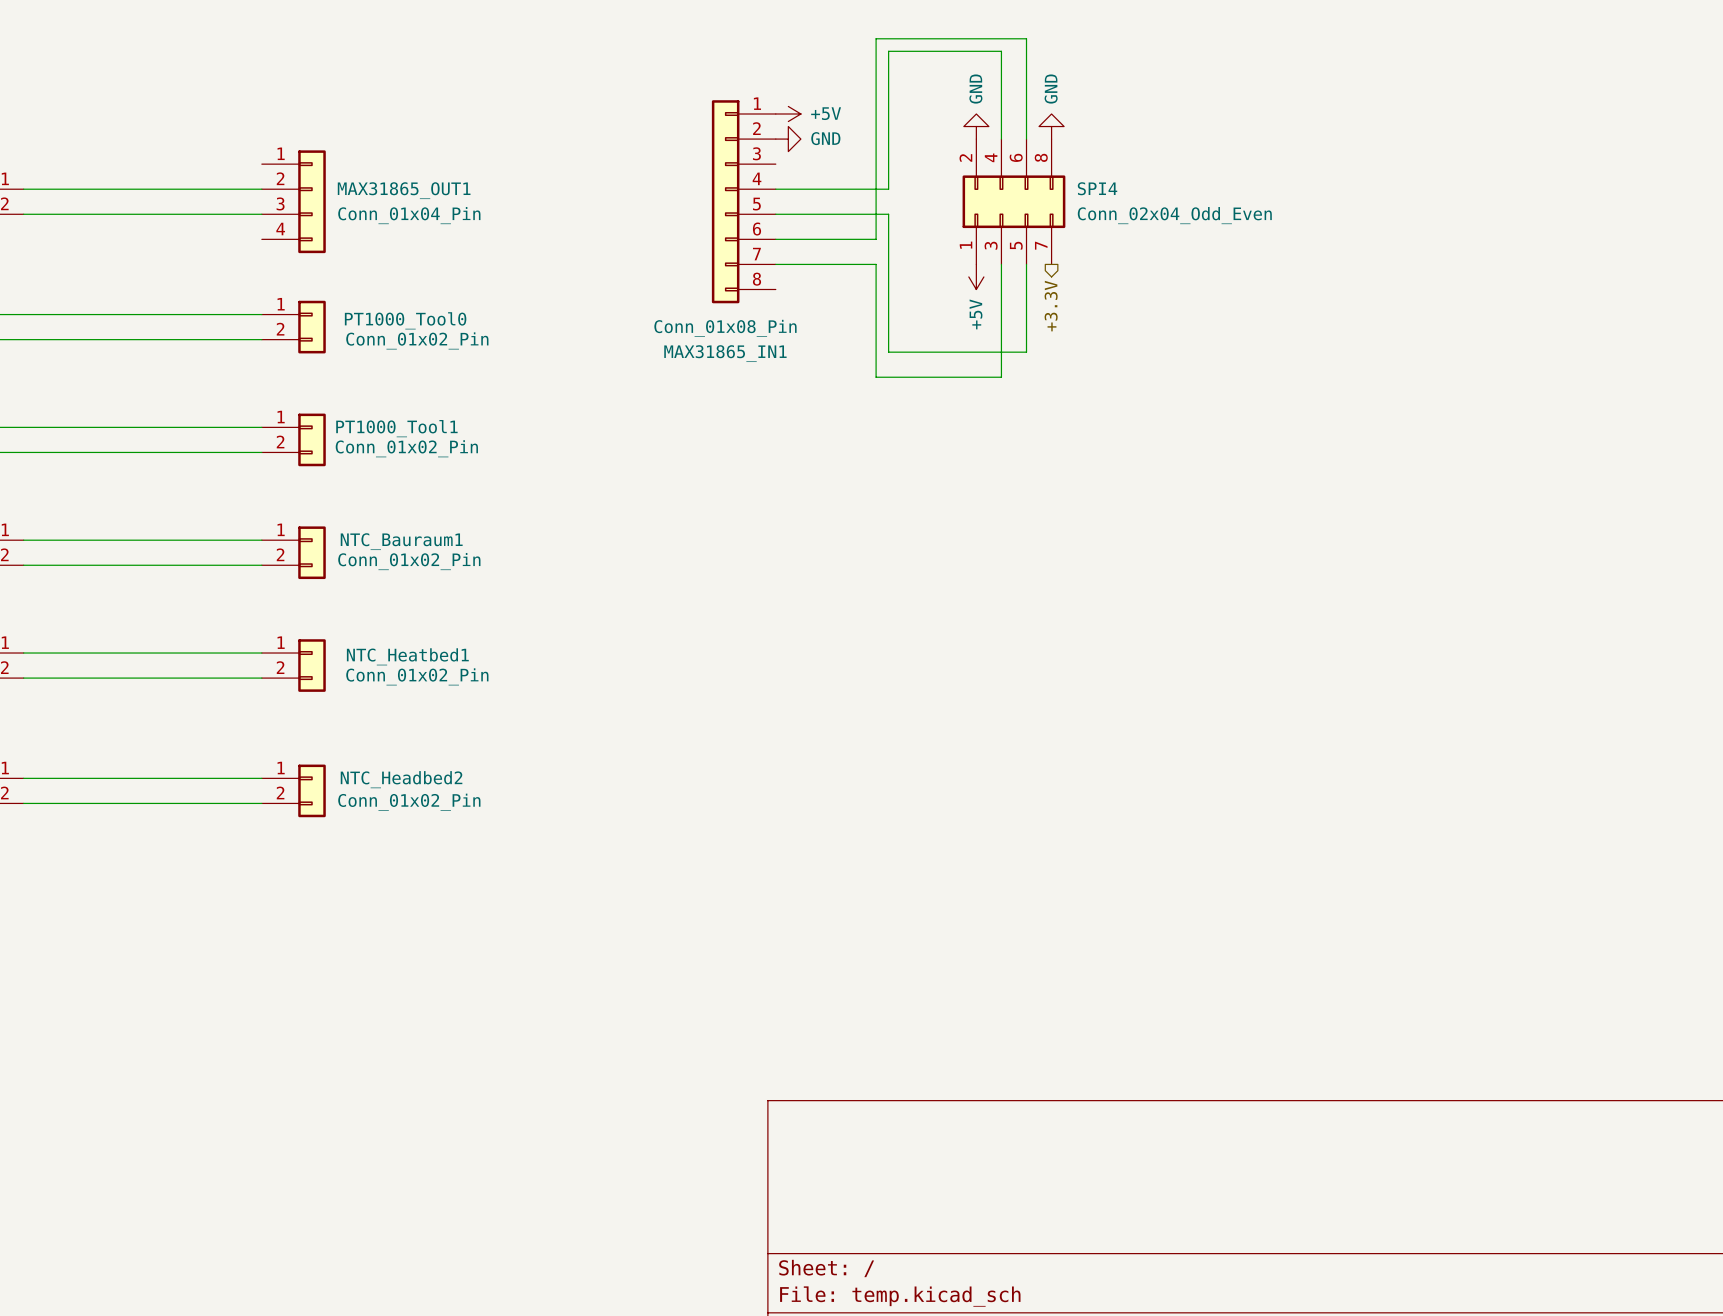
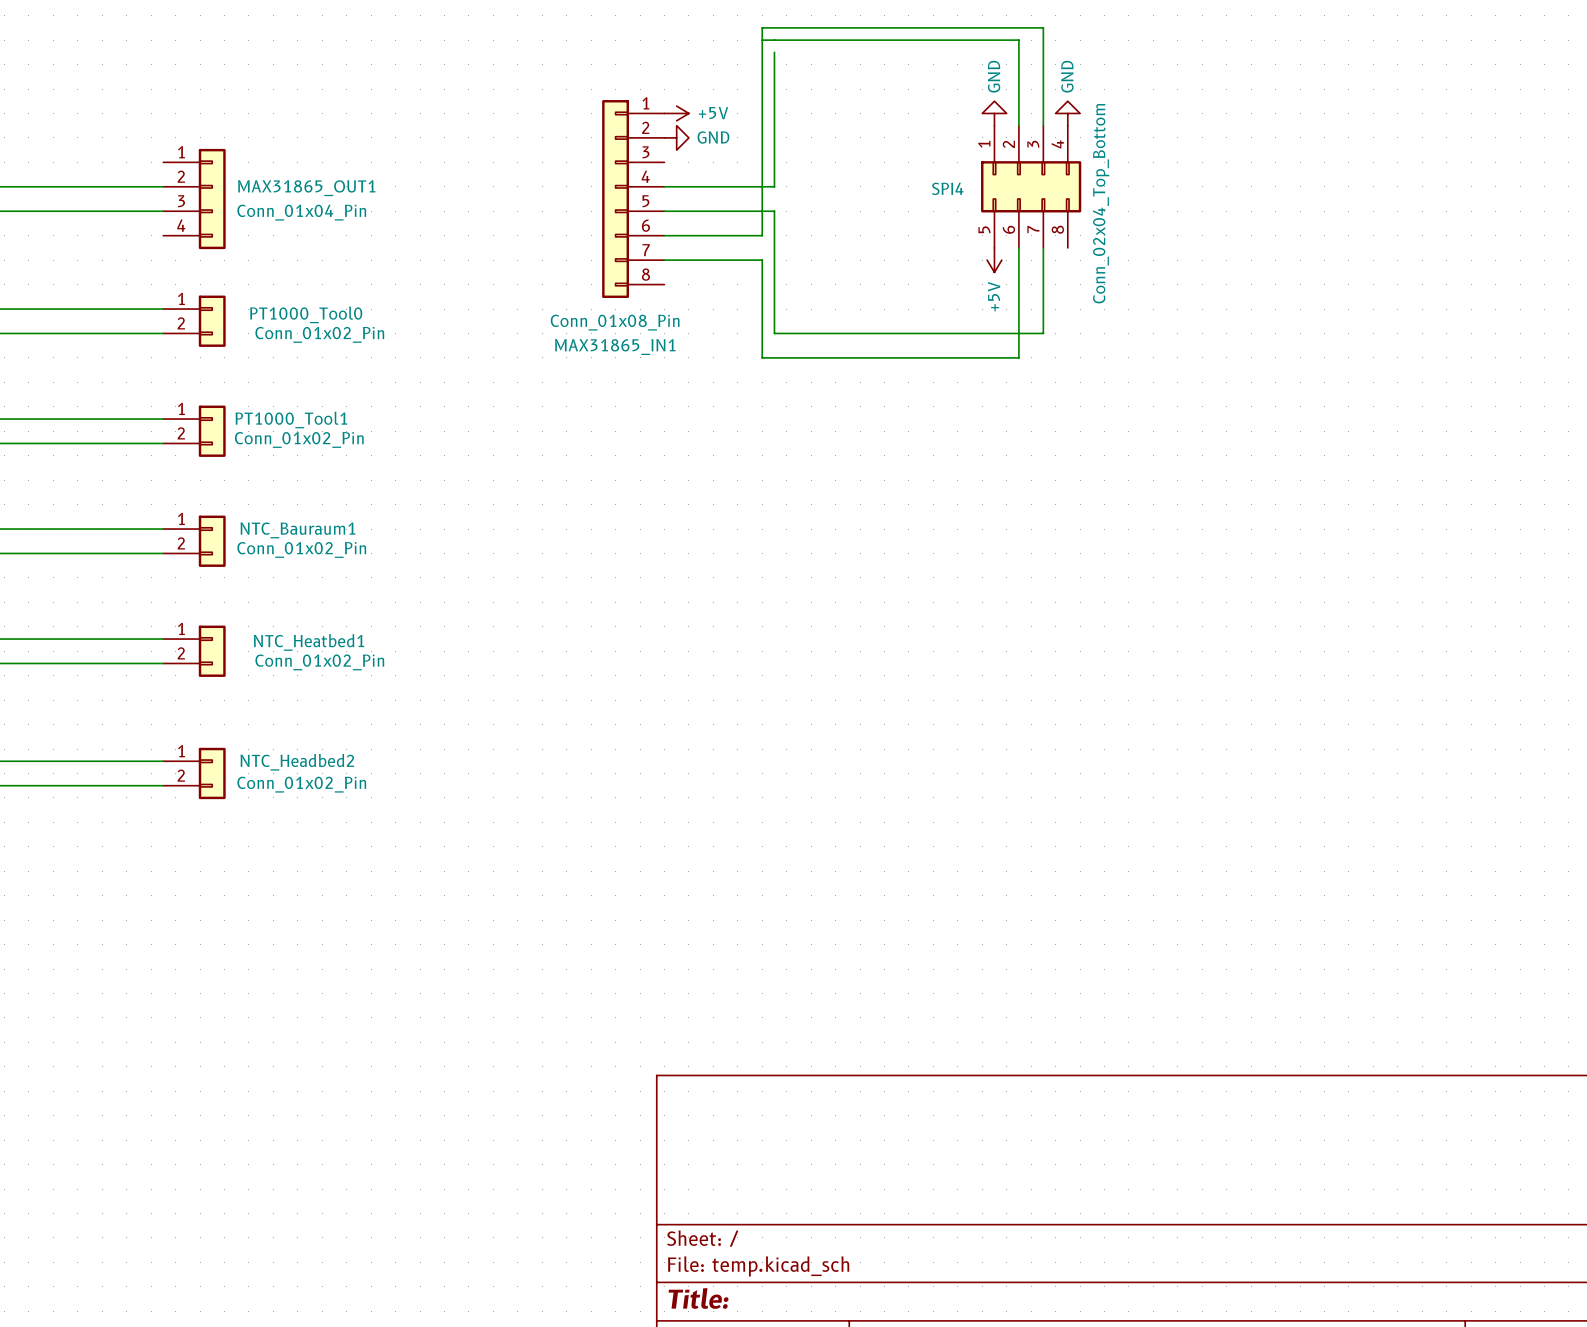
wire: none -> (762, 40) (762, 27) (1043, 27) (1043, 125)
wire: (1026, 38) (1026, 139) -> (908, 40) (1018, 40) (1018, 125)
wire: (888, 51) (1001, 51) (1001, 139) -> none
power symbol: none -> GND (1067, 113)
power symbol: GND (976, 126) -> none
power symbol position: GND (1051, 126) -> GND (994, 113)
SPI4 pin number: 2 (965, 157) -> 1 (984, 144)
SPI4 pin number: 4 (991, 157) -> 2 (1008, 144)
SPI4 pin number: 6 (1016, 157) -> 3 (1033, 144)
SPI4 pin number: 8 (1041, 157) -> 4 (1057, 144)
SPI4 name position: SPI4 (1097, 188) -> SPI4 (947, 188)
SPI4 position: (1013, 201) -> (1031, 186)
SPI4 value: Conn_02x04_Odd_Even (1174, 215) -> Conn_02x04_Top_Bottom (1101, 203)
SPI4 pin number: 1 (966, 245) -> 5 (984, 229)
SPI4 pin number: 3 (991, 245) -> 6 (1008, 229)
SPI4 pin number: 5 (1016, 245) -> 7 (1033, 229)
SPI4 pin number: 7 (1041, 245) -> 8 (1057, 229)
wire: (1001, 264) (1001, 377) (876, 377) (876, 364) -> (1018, 247) (1018, 357) (762, 357)
wire: (1026, 264) (1026, 352) (888, 352) (888, 339) -> (1043, 247) (1043, 333) (774, 333)
power symbol position: +5V (976, 276) -> +5V (994, 260)
hierarchical label: +3.3V (1051, 306) -> none

